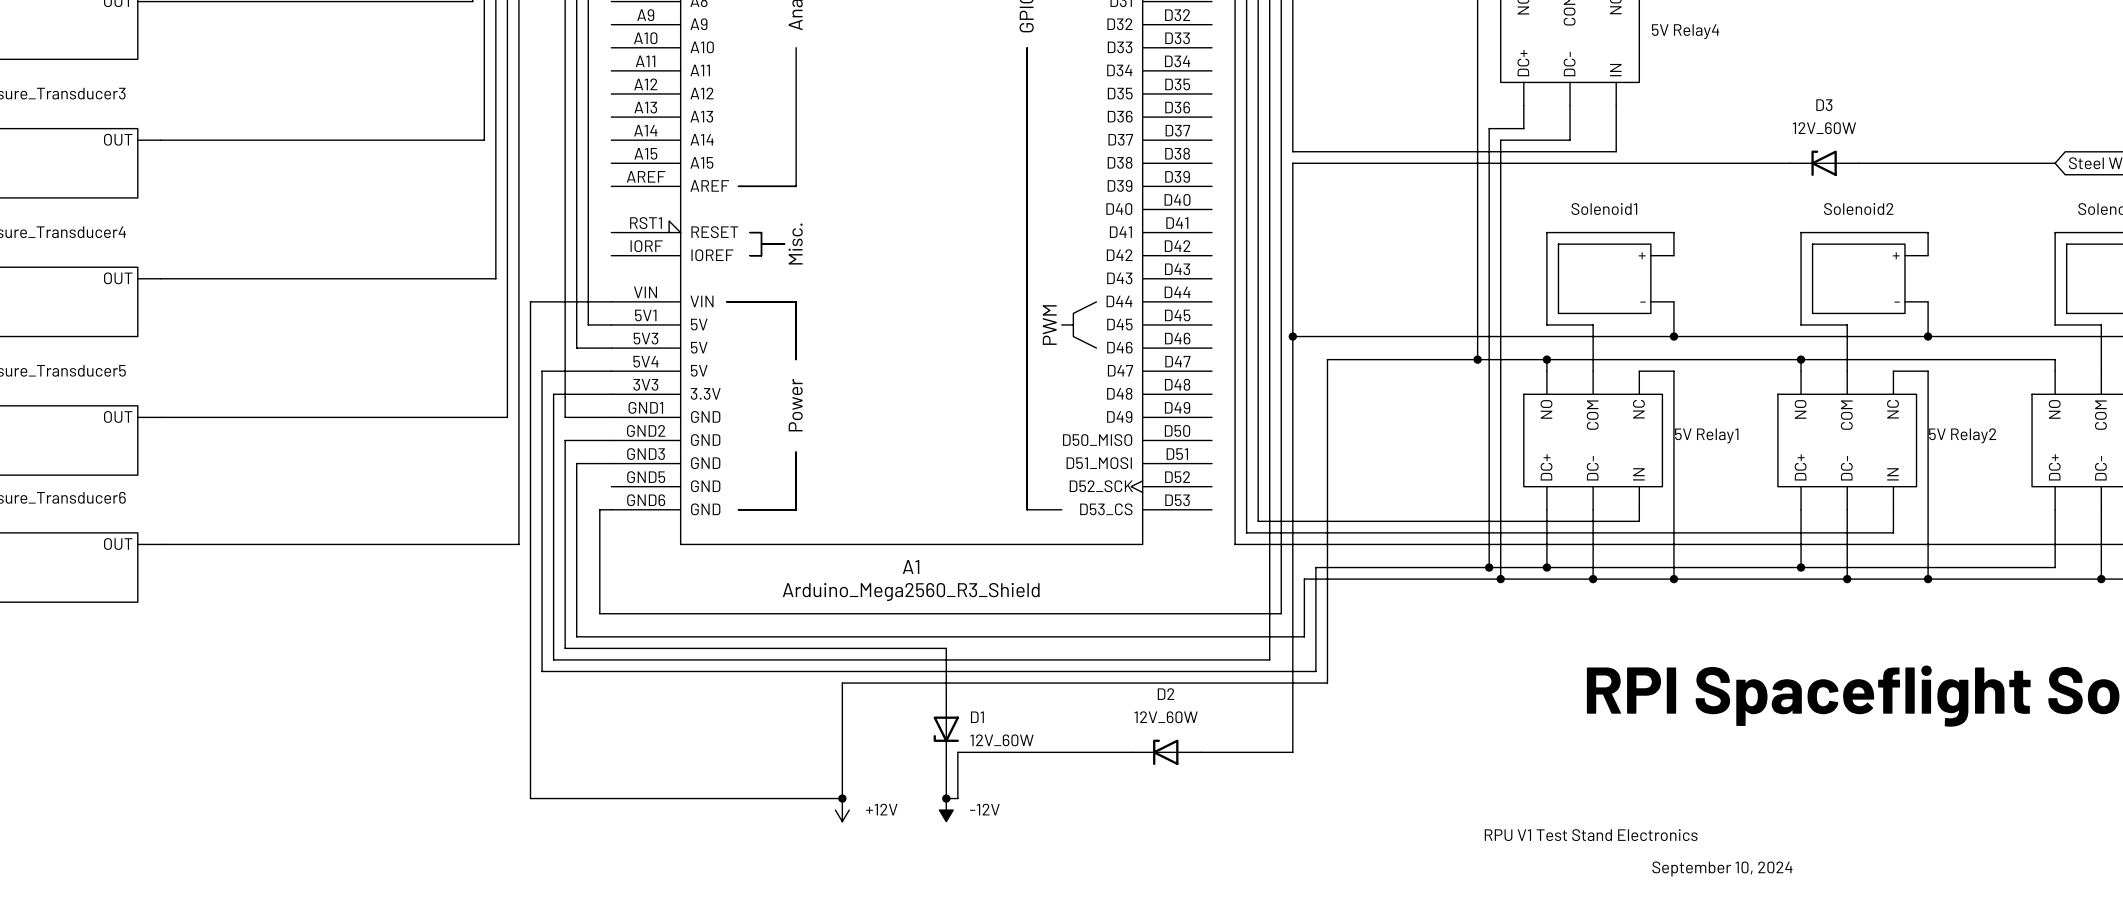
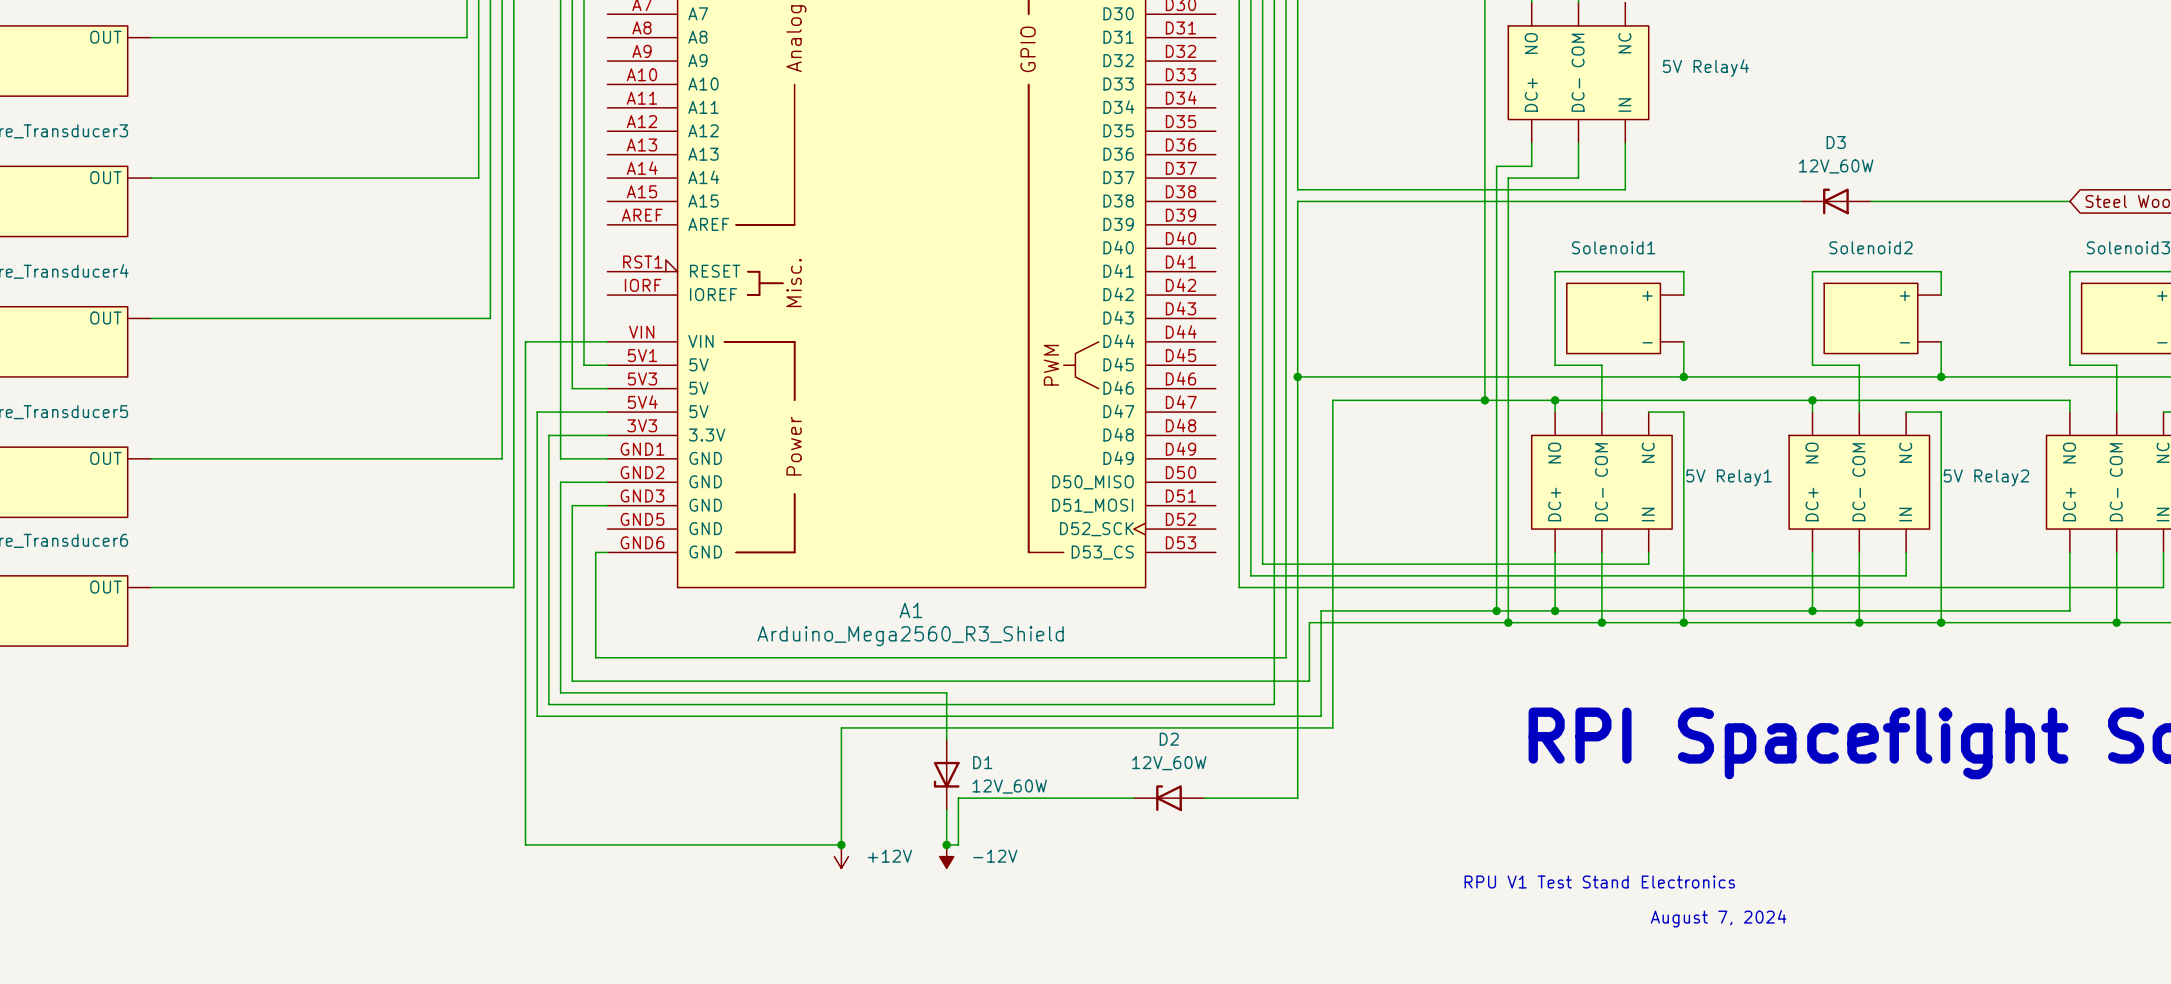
text: September 10, 2024 (1722, 868) -> none
text: none -> August 7, 2024 (1718, 918)

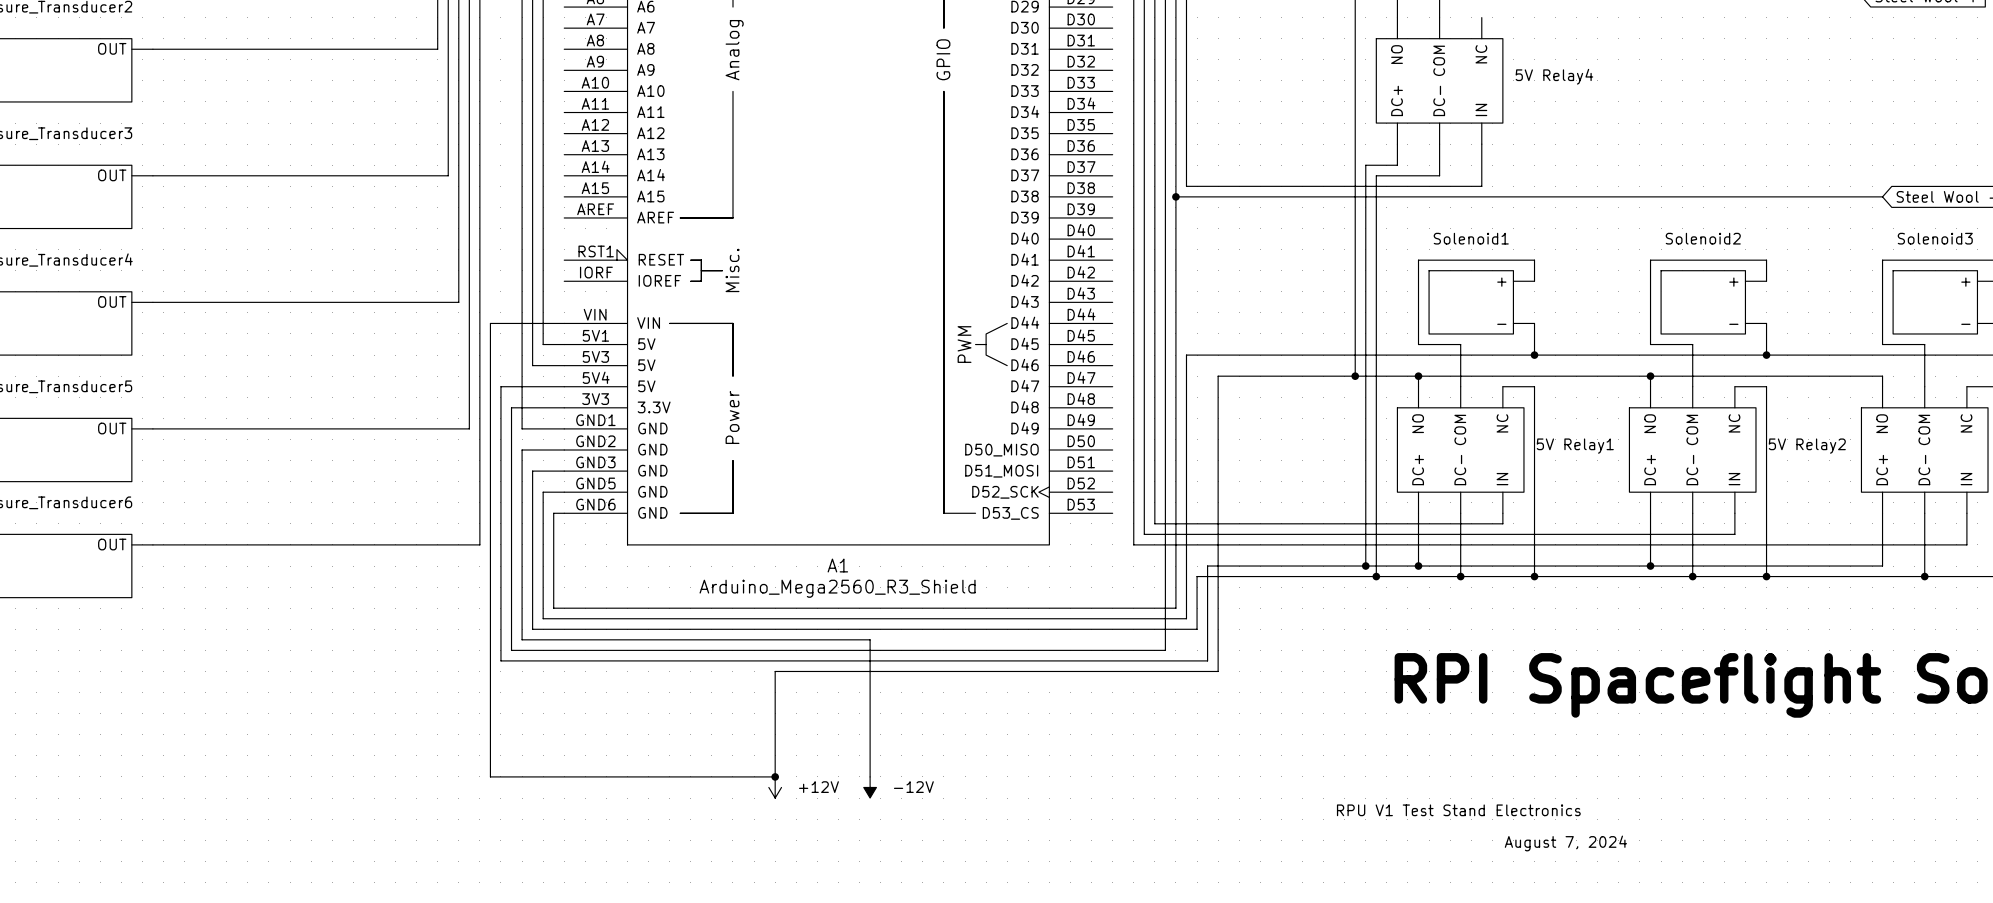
junction: none -> (1175, 196)
wire: (1297, 201) (1297, 376) -> (1186, 196) (1175, 196)
D3: 12V_60W (1835, 201) -> none
junction: (1297, 376) -> none
wire: (1297, 669) (1297, 798) (1204, 798) -> (1186, 618) (543, 618) (543, 492) (564, 492)
D1: 12V_60W (946, 774) -> none
wire: (1133, 798) (958, 798) (958, 844) (946, 844) -> none
D2: 12V_60W (1169, 798) -> none
junction: (946, 844) -> none

